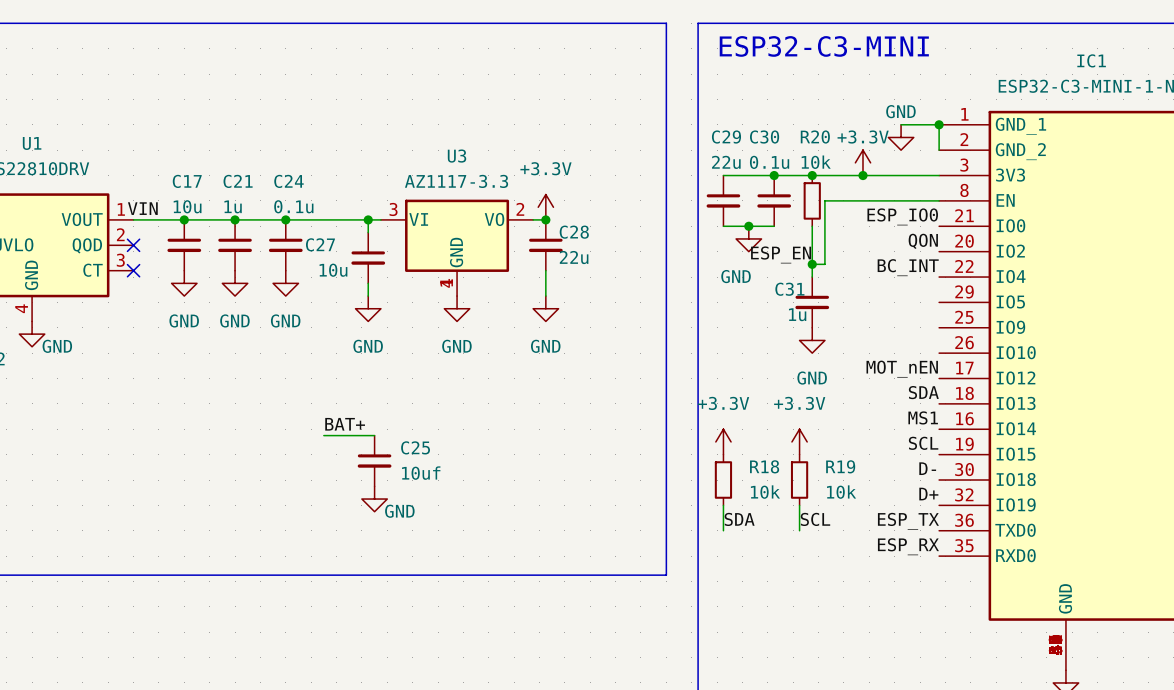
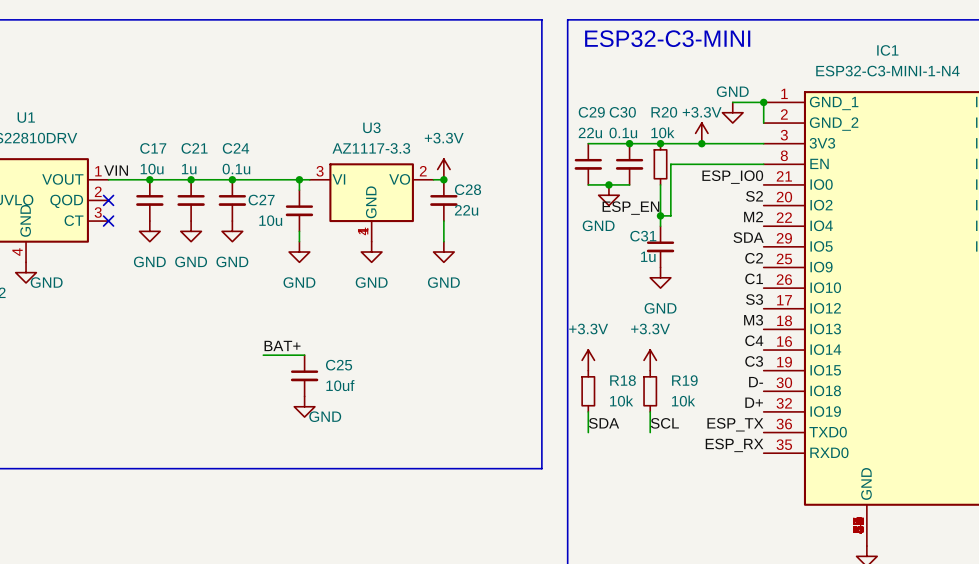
label: QON (923, 241) -> S2 (754, 196)
label: BC_INT (908, 267) -> M2 (753, 216)
label: none -> SDA (748, 237)
label: none -> C2 (754, 258)
label: none -> C1 (754, 278)
label: MOT_nEN (902, 369) -> S3 (754, 299)
label: SDA (923, 392) -> M3 (753, 320)
label: MS1 (923, 417) -> C4 (754, 340)
label: SCL (923, 443) -> C3 (754, 361)

